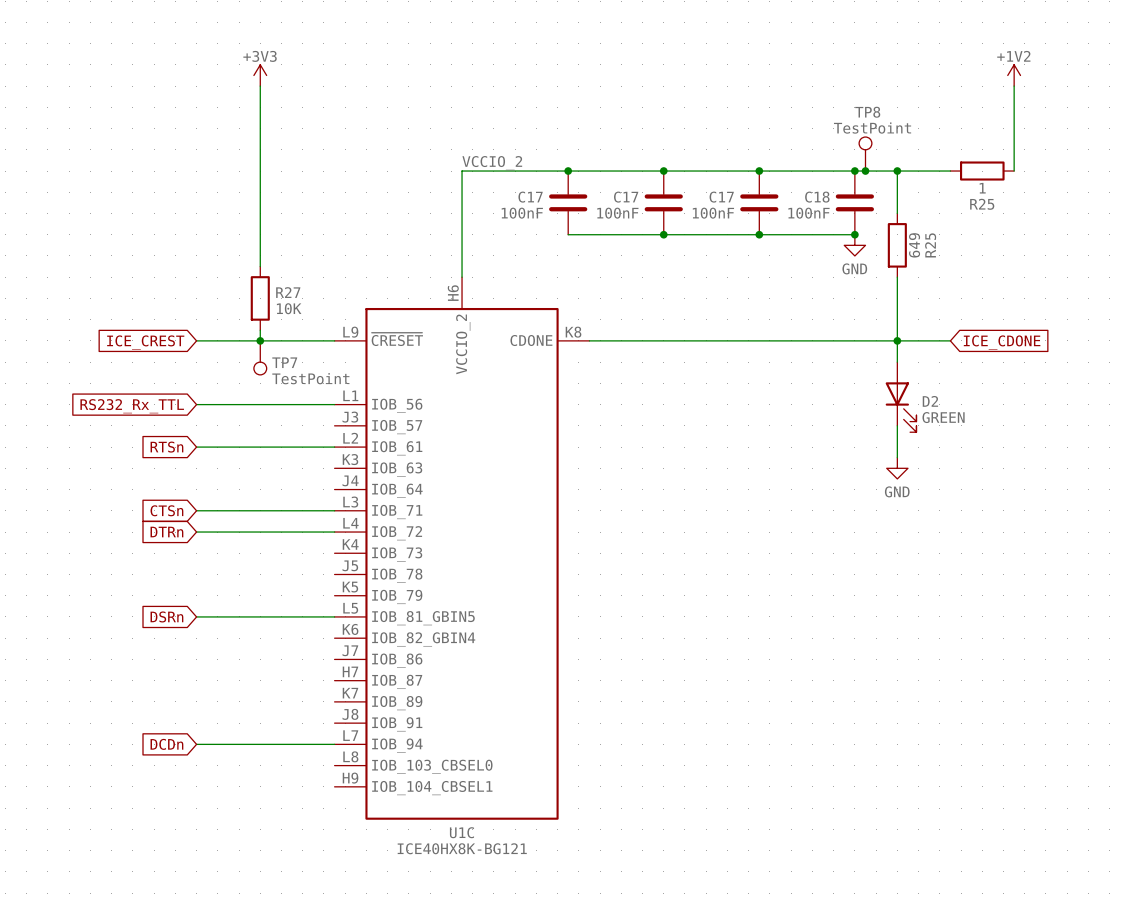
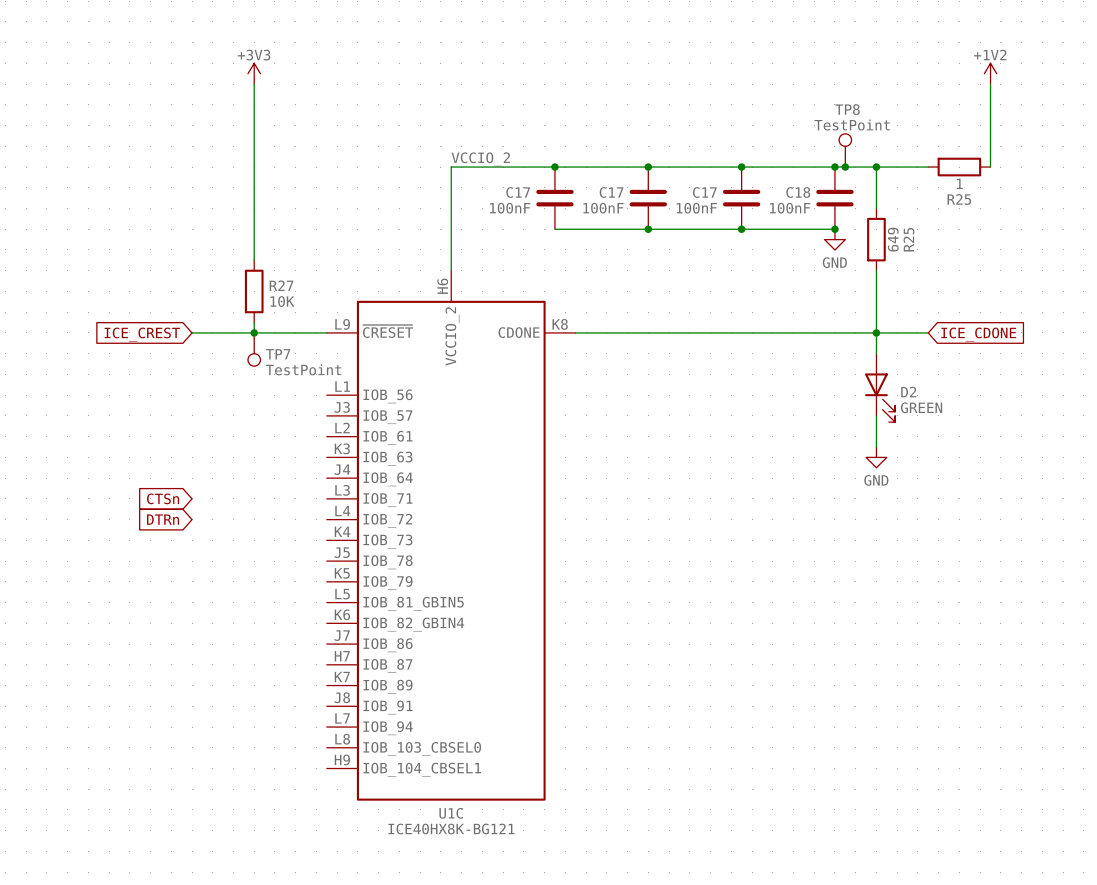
wire: (196, 404) (334, 404) -> none
global label: RS232_Rx_TTL (132, 406) -> none
global label: RTSn (166, 447) -> none
wire: (196, 447) (334, 447) -> none
wire: (196, 510) (334, 510) -> none
wire: (196, 532) (334, 532) -> none
global label: DSRn (166, 616) -> none
wire: (196, 616) (334, 616) -> none
global label: DCDn (166, 744) -> none
wire: (196, 744) (334, 744) -> none

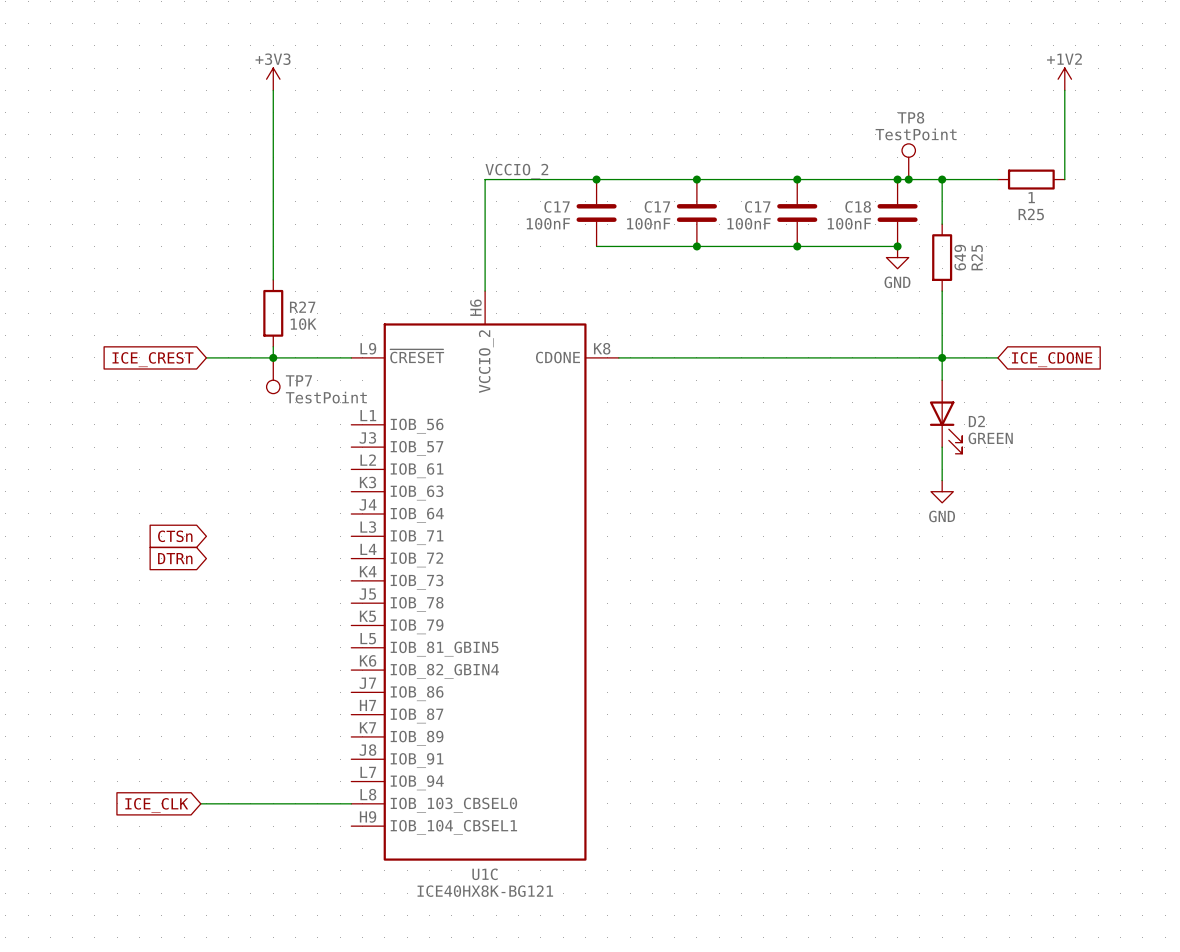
wire: none -> (200, 803) (351, 803)
global label: none -> ICE_CLK (156, 805)

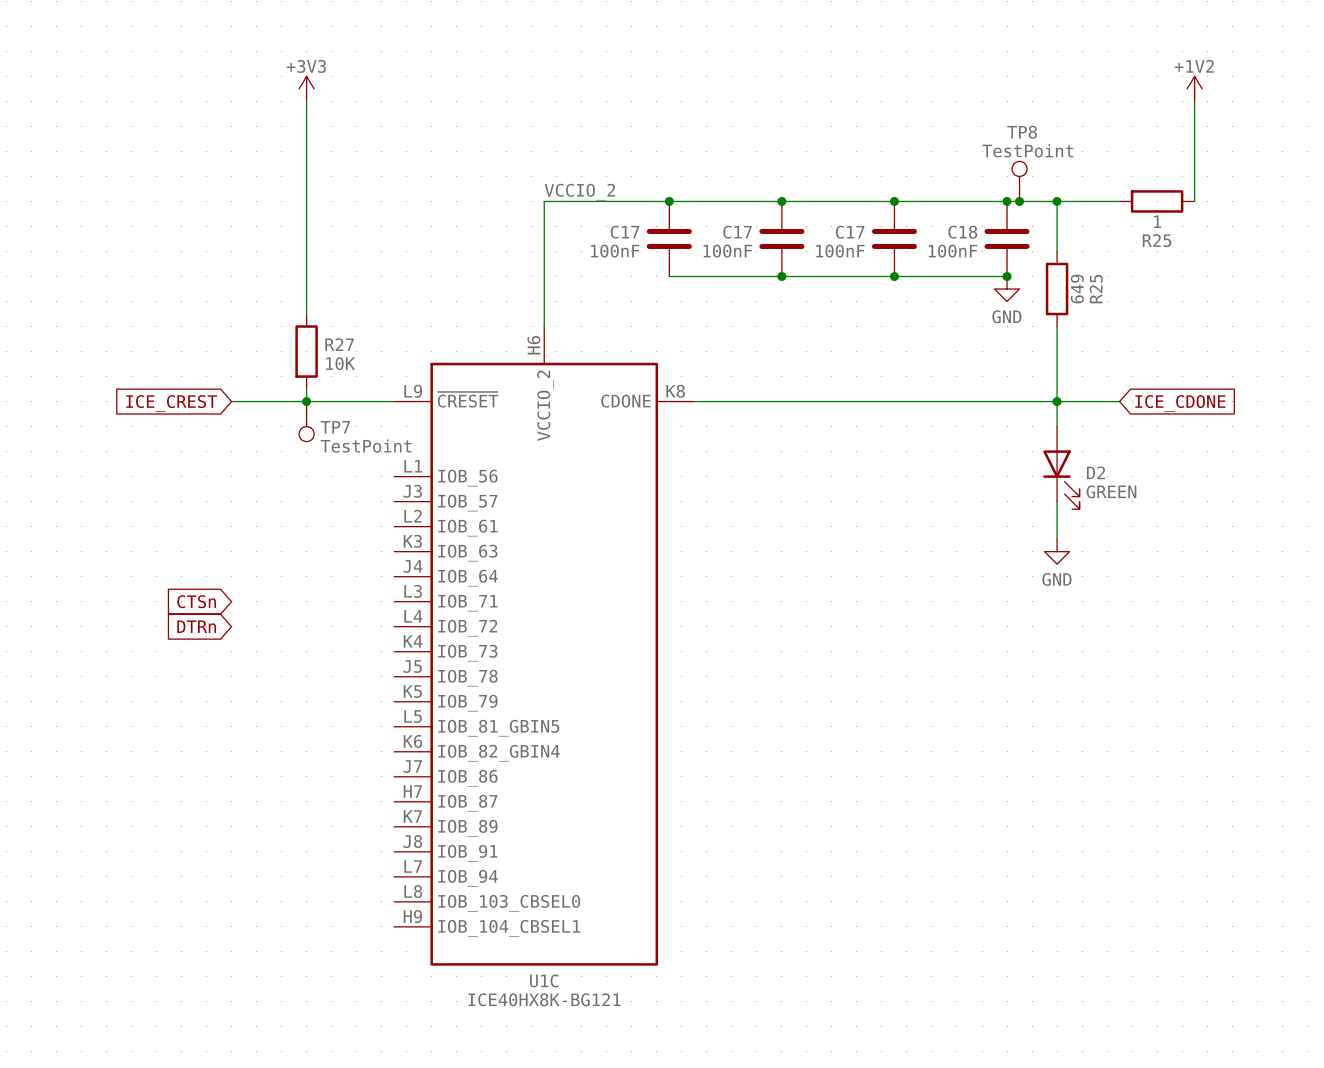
wire: (200, 803) (351, 803) -> none
global label: ICE_CLK (156, 805) -> none

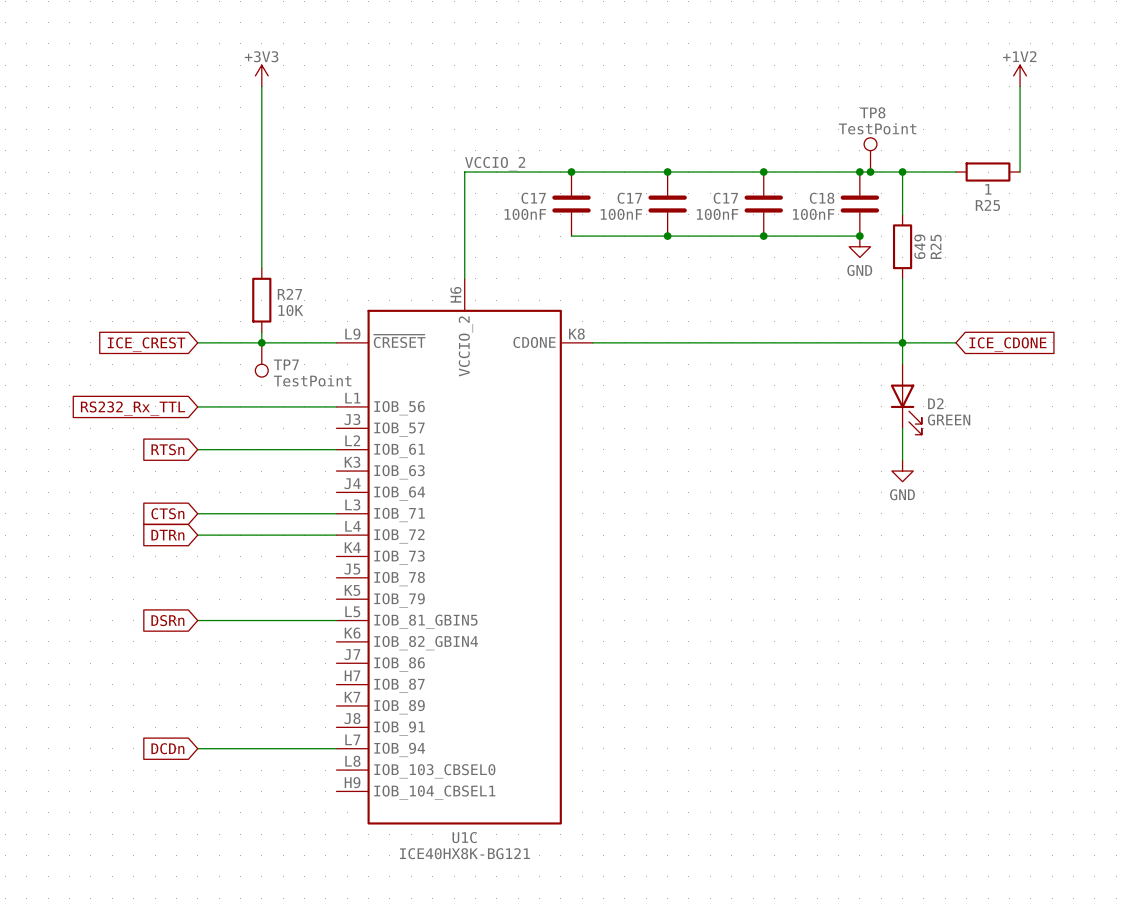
wire: none -> (197, 406) (336, 406)
global label: none -> RS232_Rx_TTL (132, 408)
global label: none -> RTSn (167, 449)
wire: none -> (197, 449) (336, 449)
wire: none -> (197, 513) (336, 513)
wire: none -> (197, 535) (336, 535)
global label: none -> DSRn (167, 620)
wire: none -> (197, 620) (336, 620)
global label: none -> DCDn (167, 748)
wire: none -> (197, 748) (336, 748)

